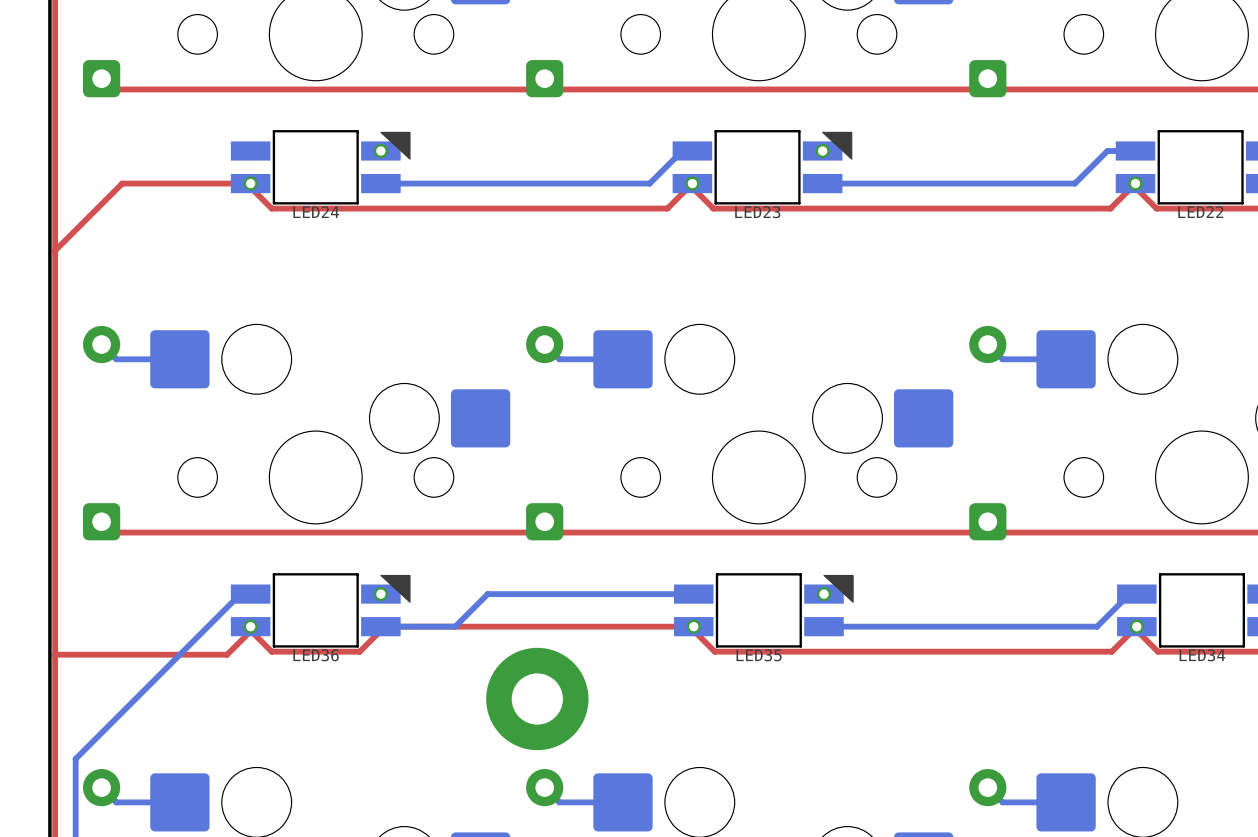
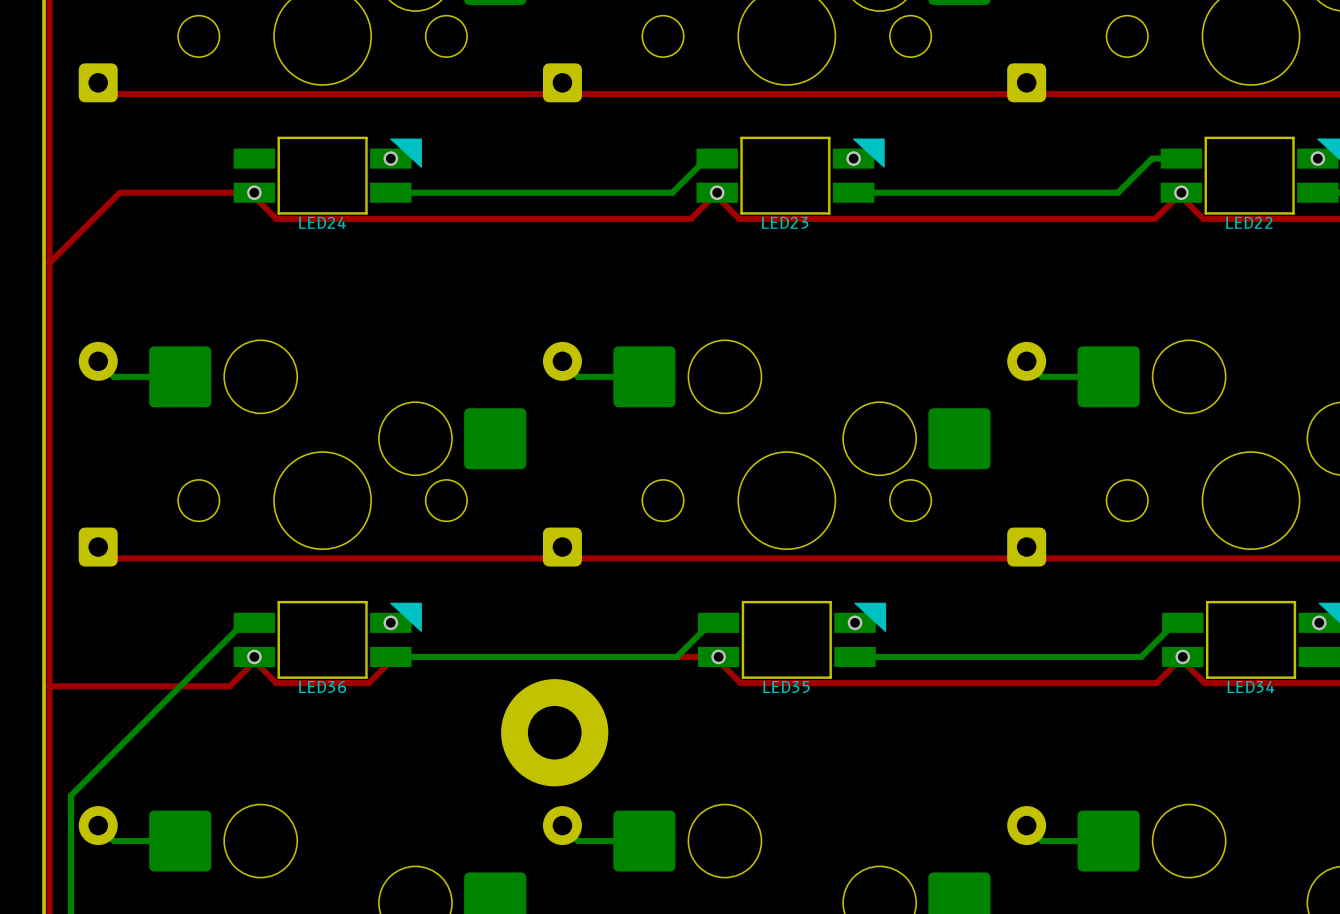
bottom track: (686, 594) (487, 594) (455, 626) -> (711, 622) (676, 656) (468, 656)

